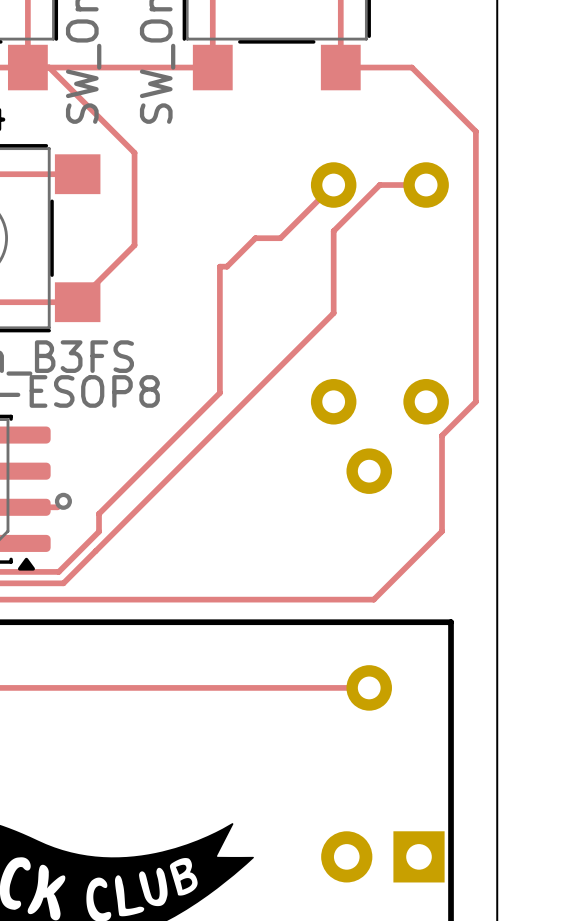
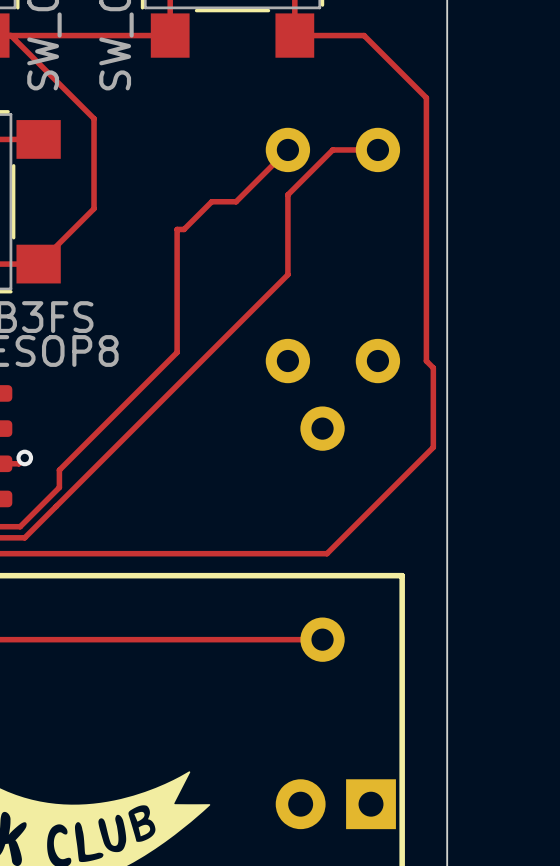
track: (475, 401) (442, 435) (442, 531) -> (426, 361) (433, 367) (433, 447) (393, 487)

